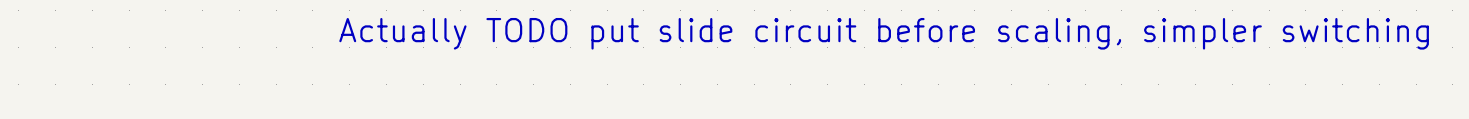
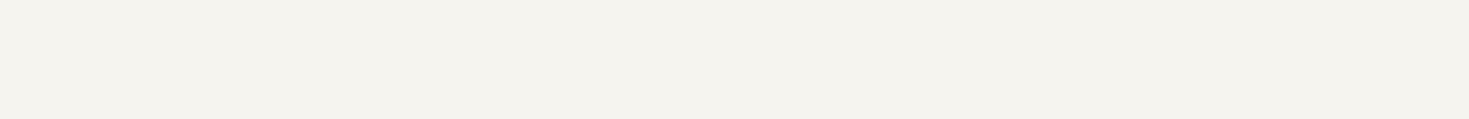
text: Actually TODO put slide circuit before scaling, simpler switching (884, 33) -> none

